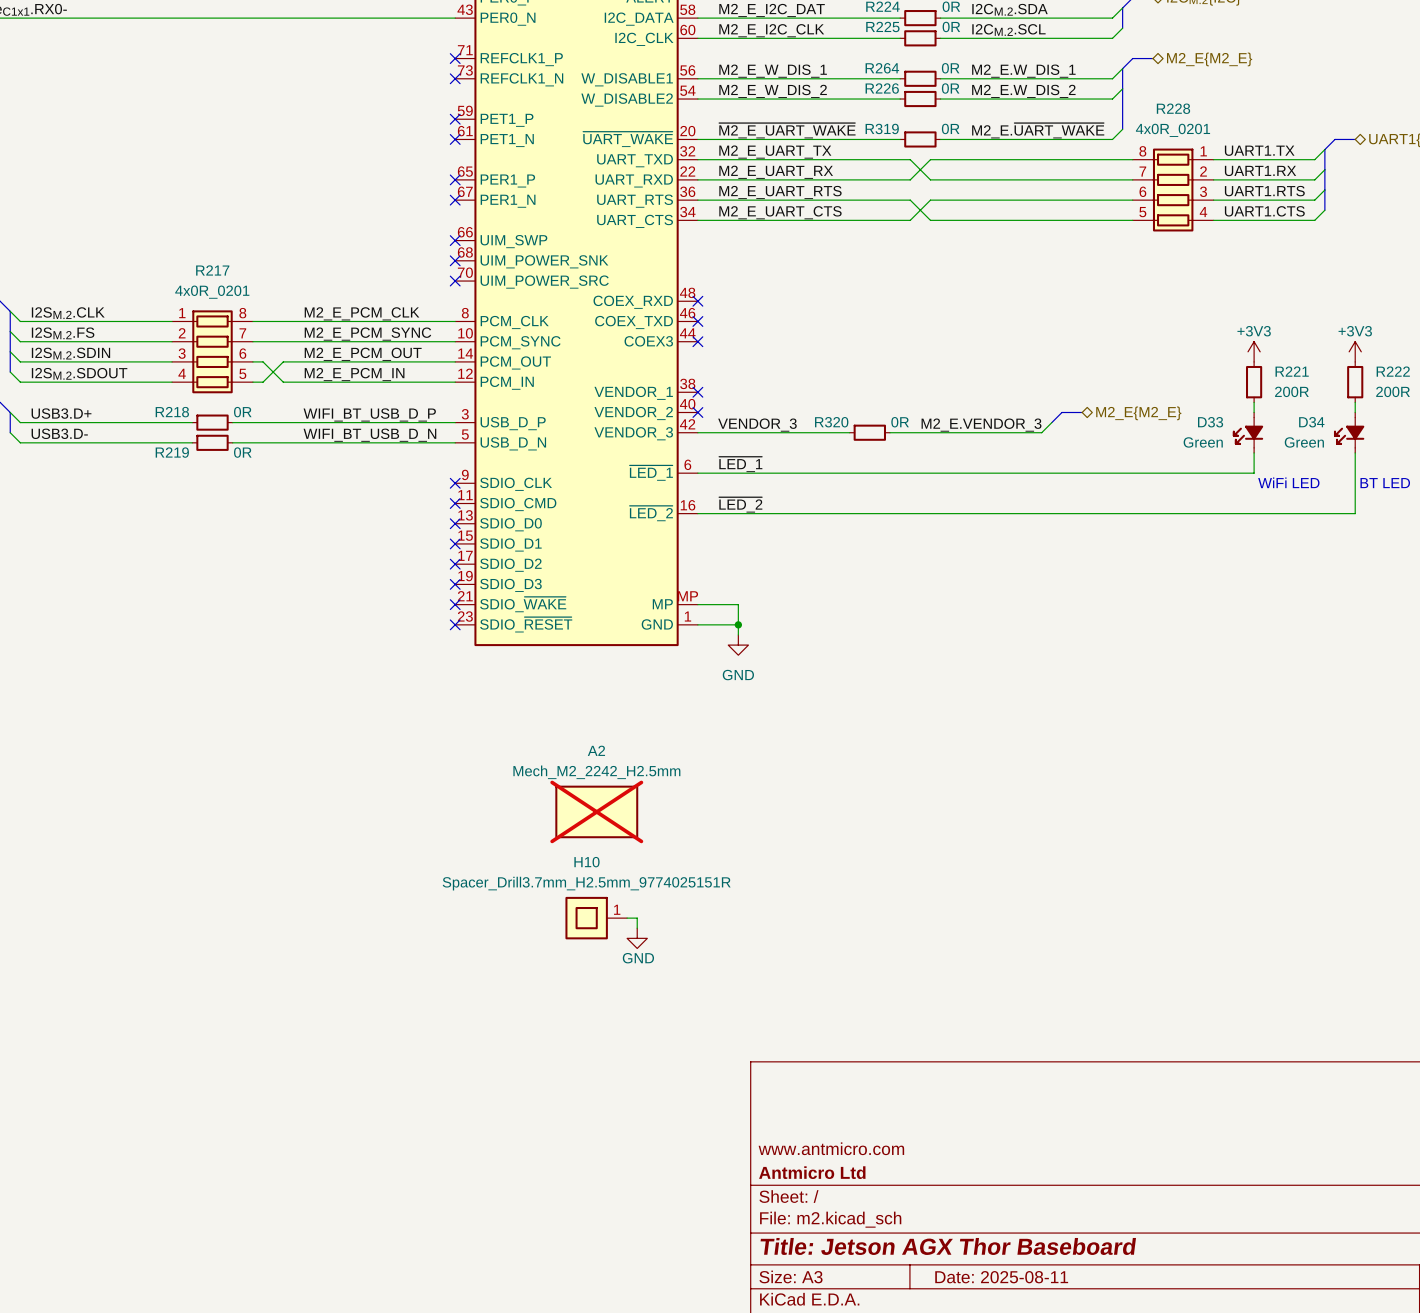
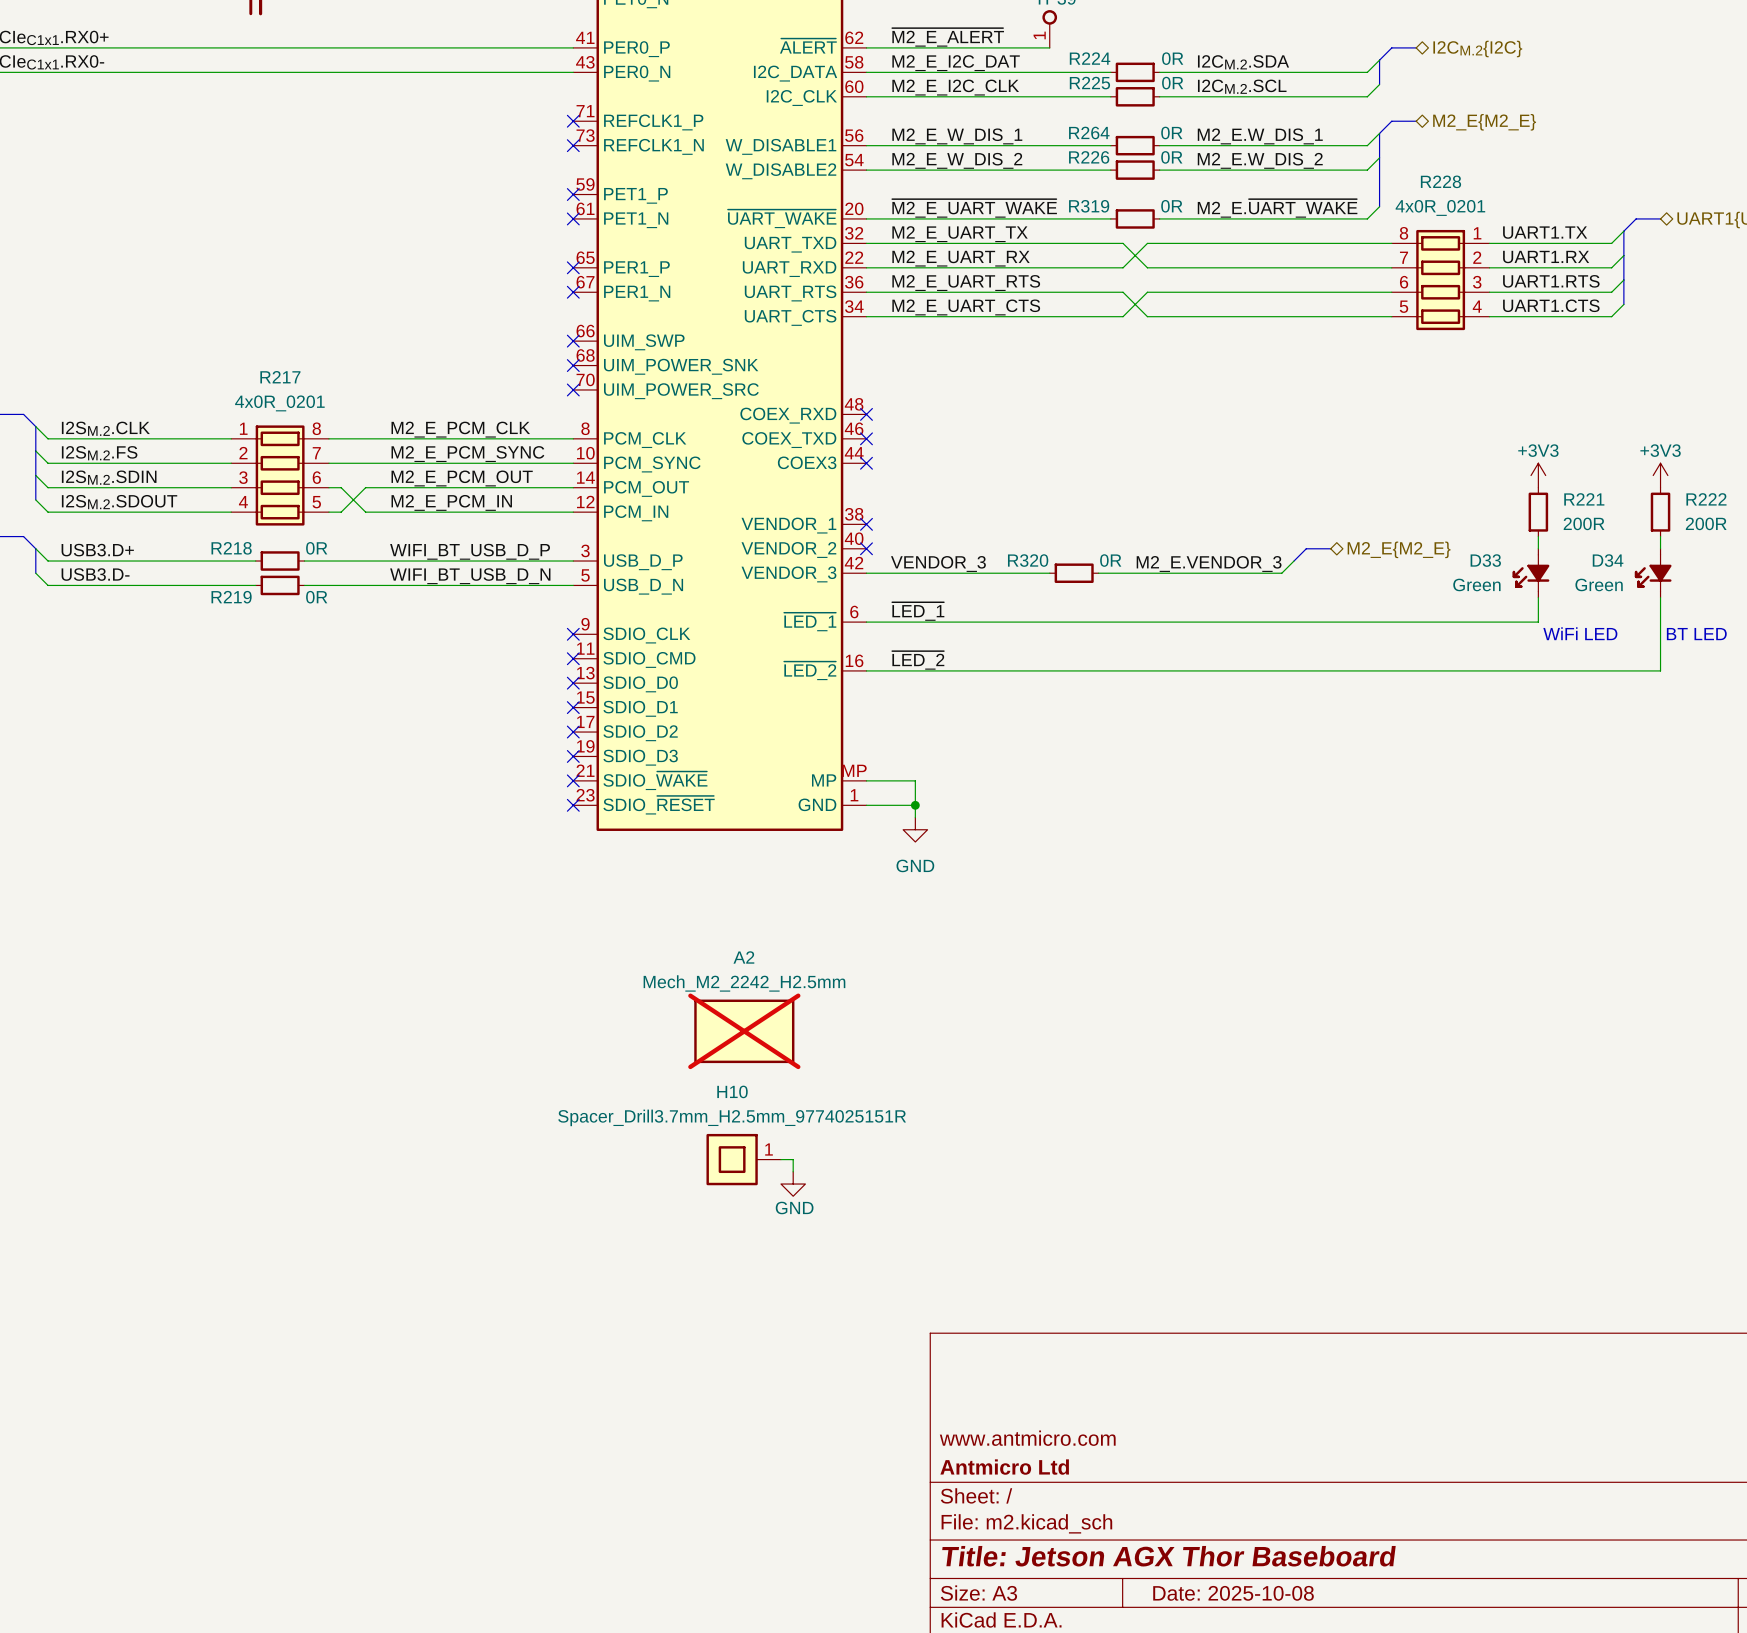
title block: Date: 2025-08-11 (1001, 1277) -> Date: 2025-10-08 (1233, 1593)

